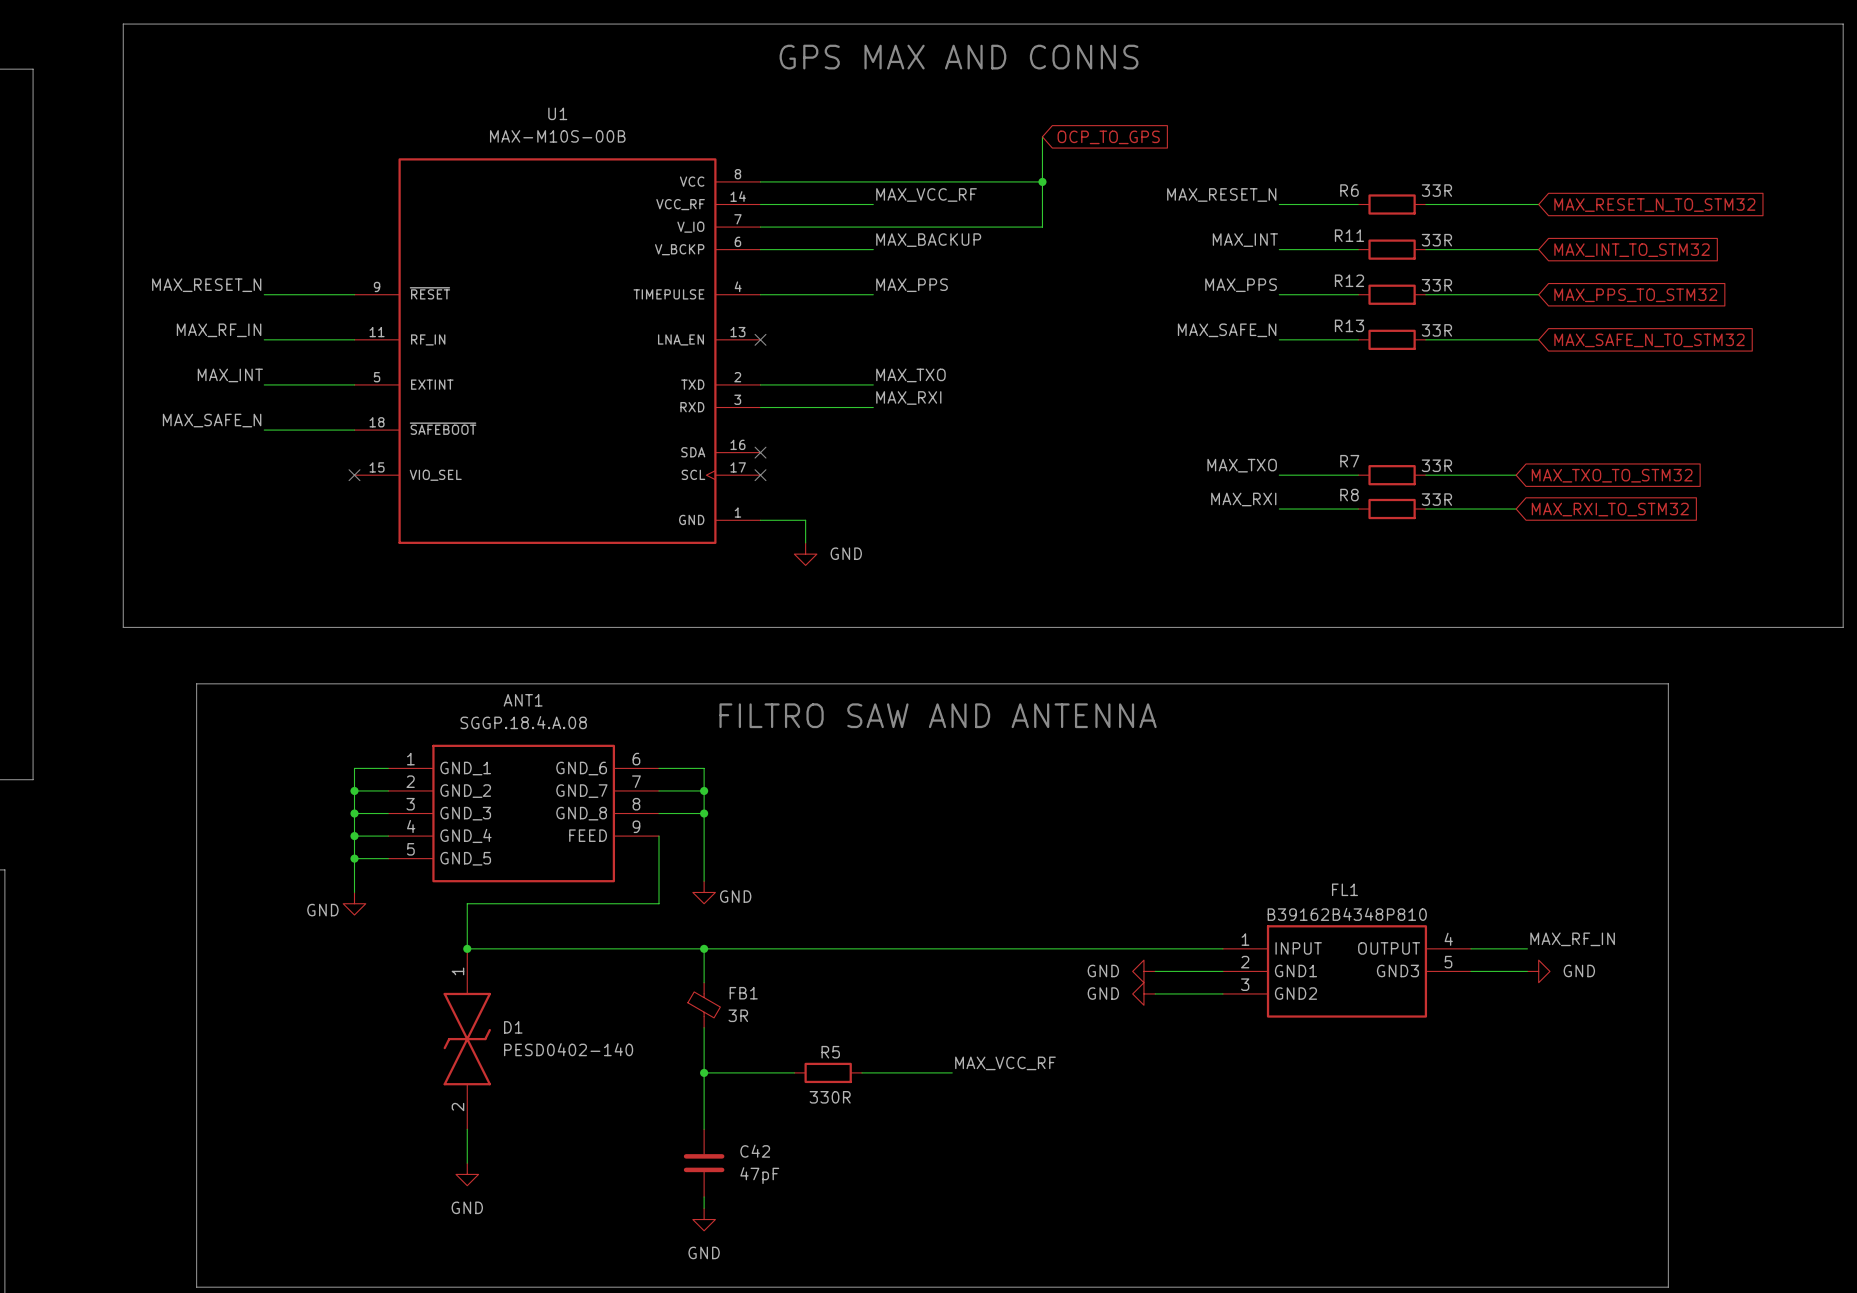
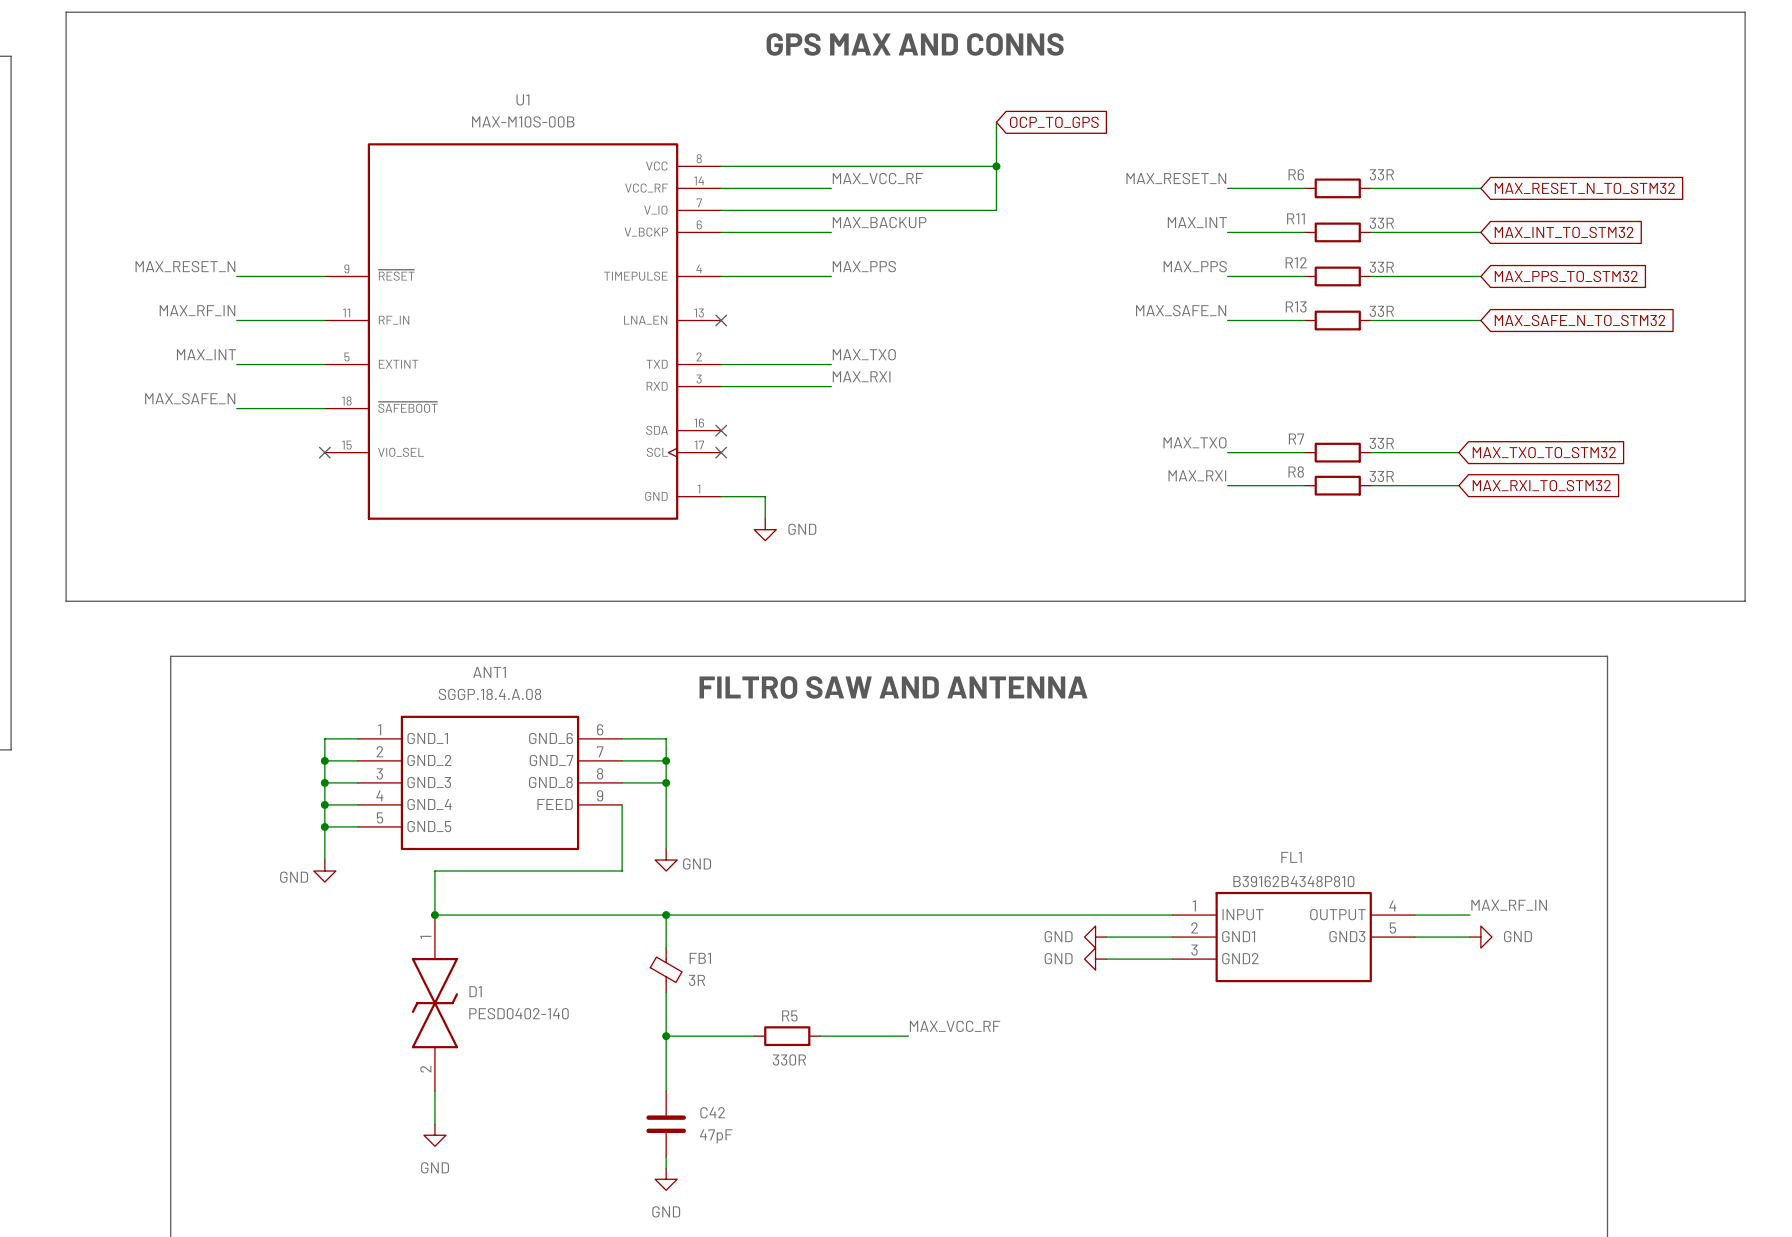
line: (123, 24) (123, 627) -> (99, 12) (66, 12) (66, 601) (99, 601)
line: (1809, 24) (1843, 24) (1843, 627) (1809, 627) -> (1745, 12) (1745, 601)

